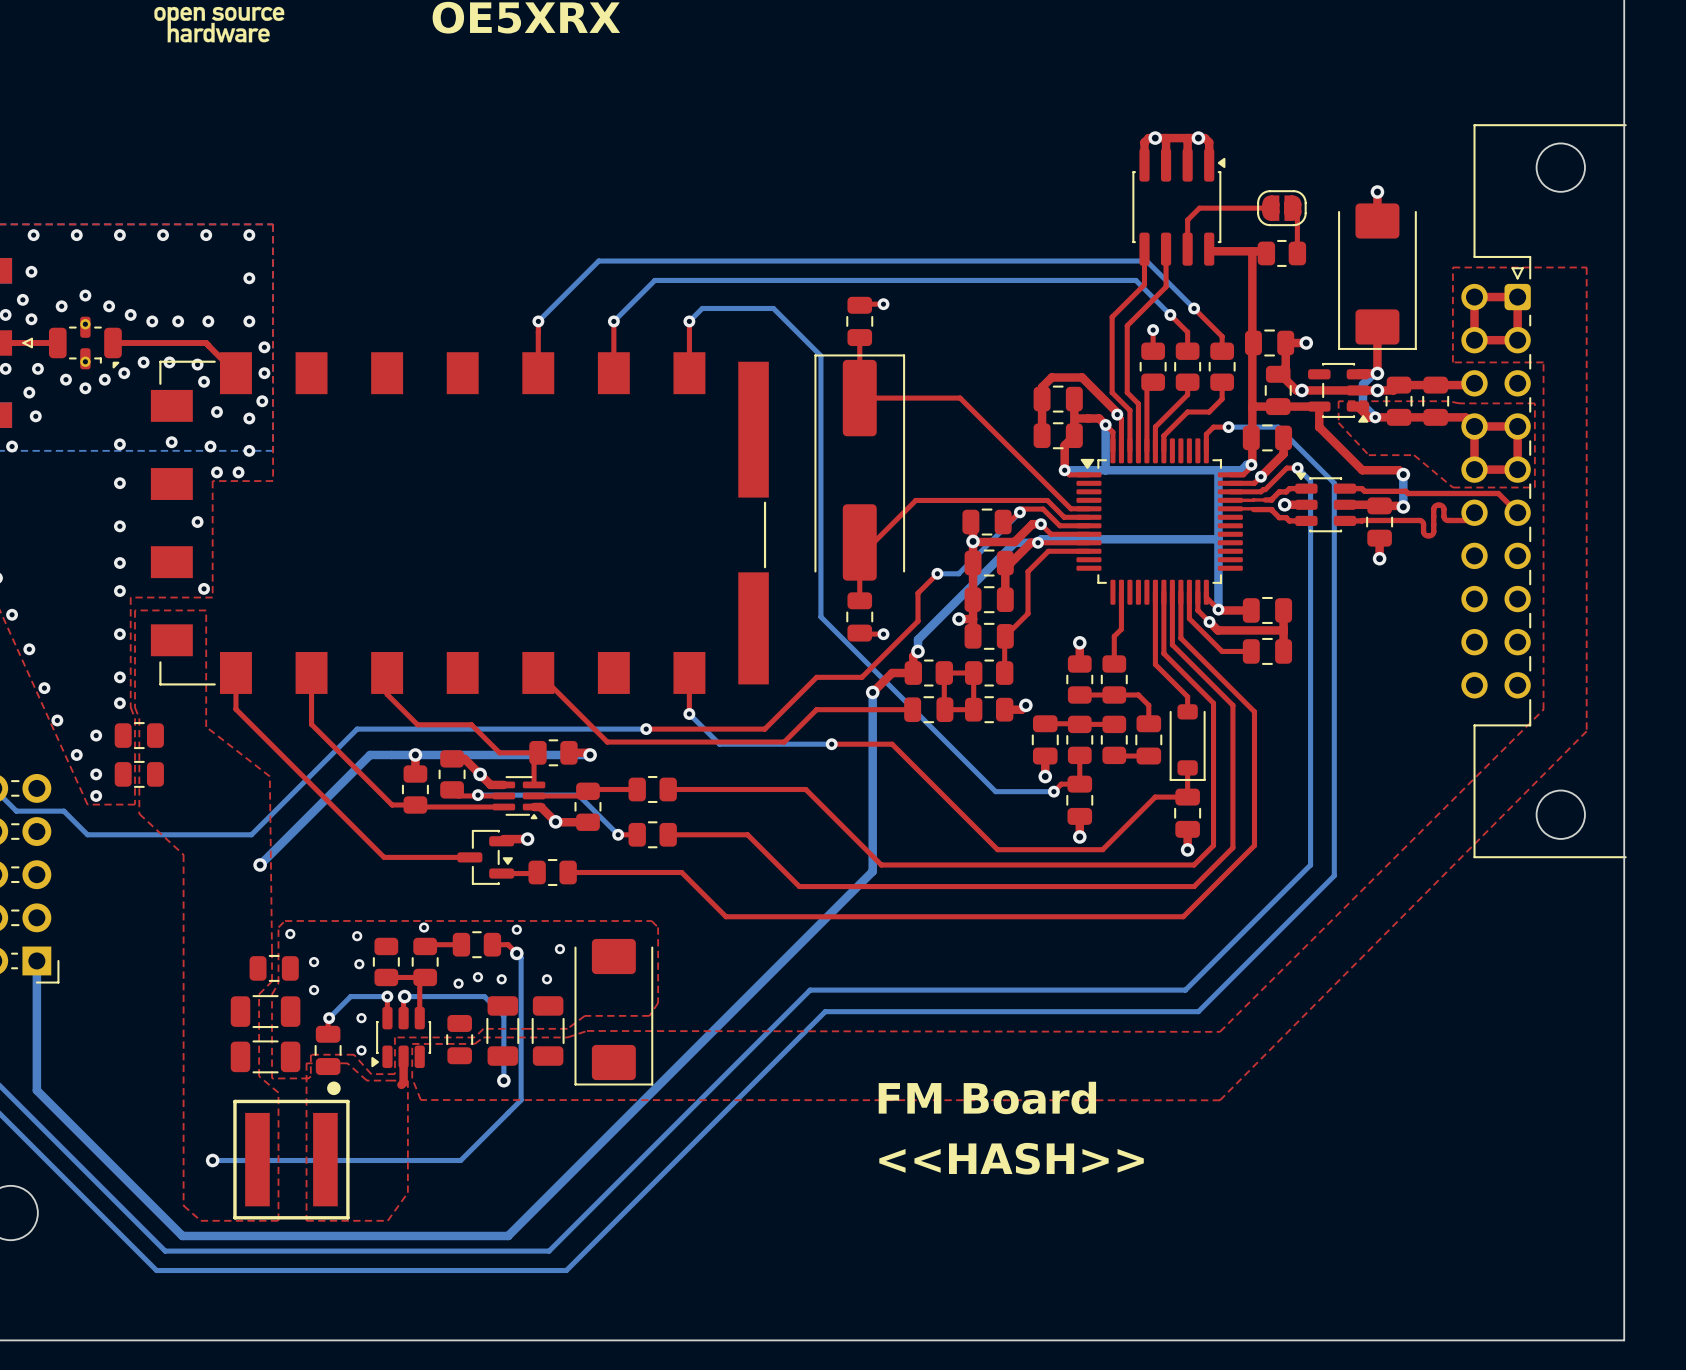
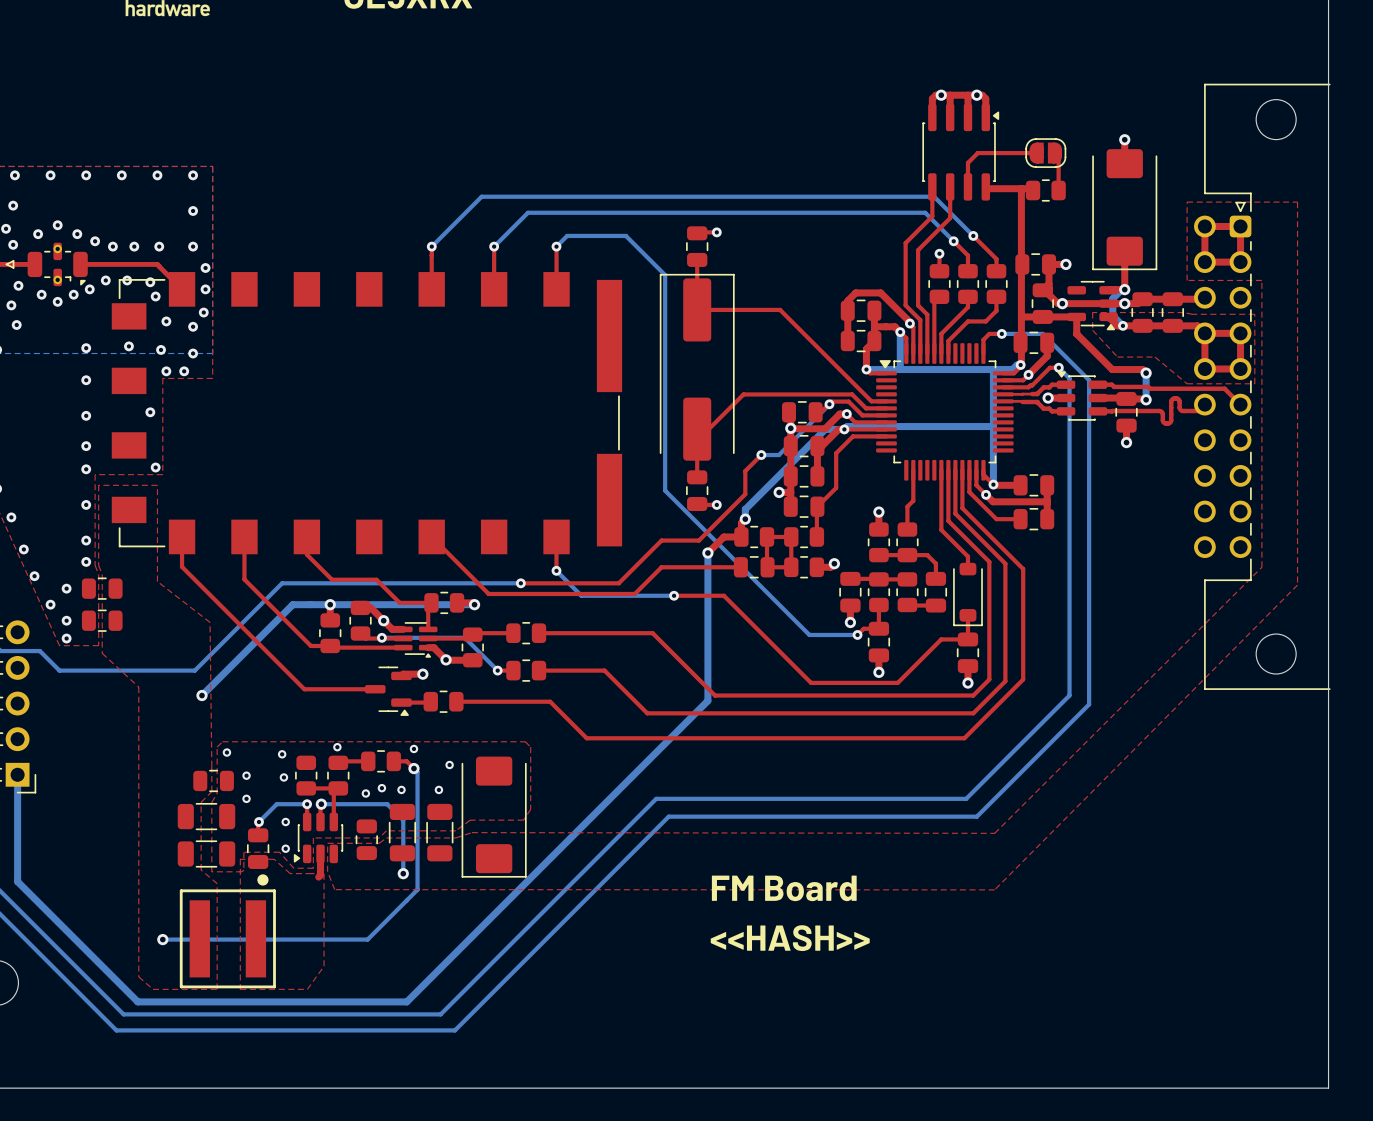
part footprint: [1308, 362, 1370, 423] -> [1067, 280, 1118, 331]
part footprint: [457, 829, 515, 885] -> [364, 666, 412, 716]

